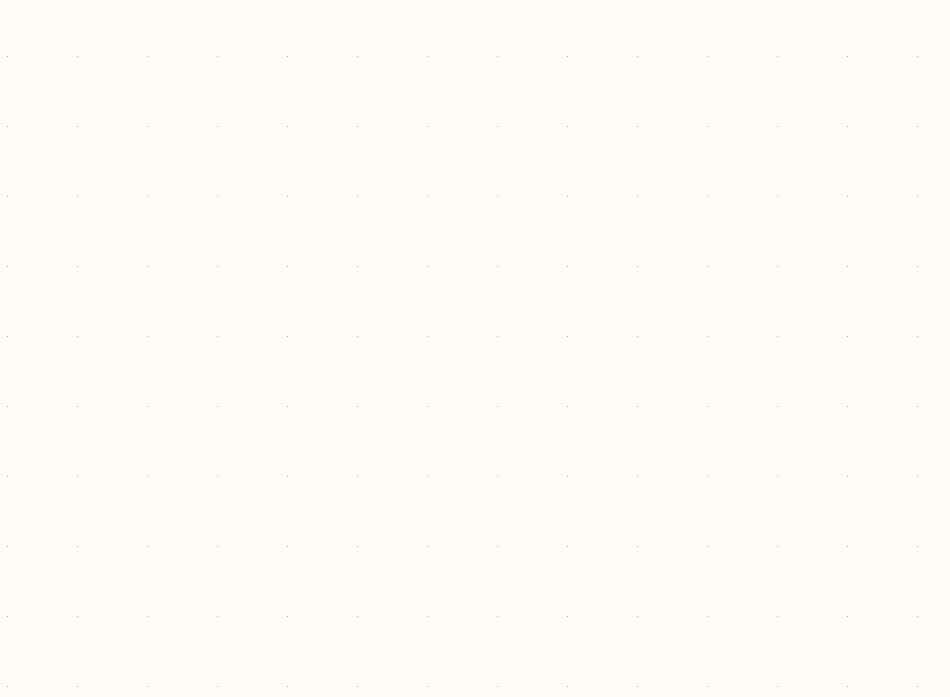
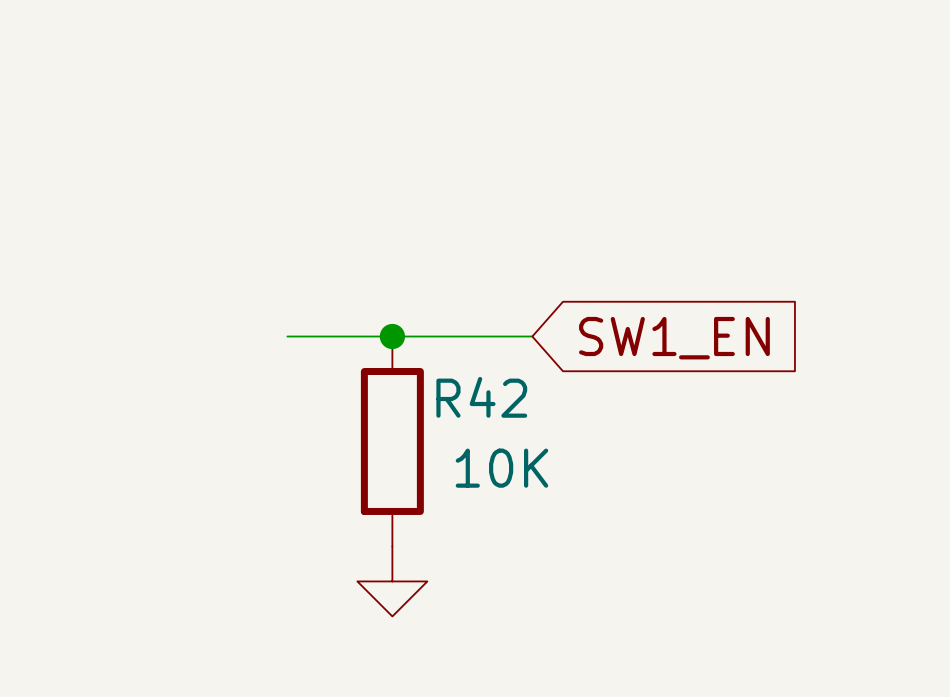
wire: none -> (287, 336) (532, 336)
junction: none -> (392, 336)
global label: none -> SW1_EN (674, 338)
R42: none -> 10K (392, 441)
power symbol: none -> (392, 581)

